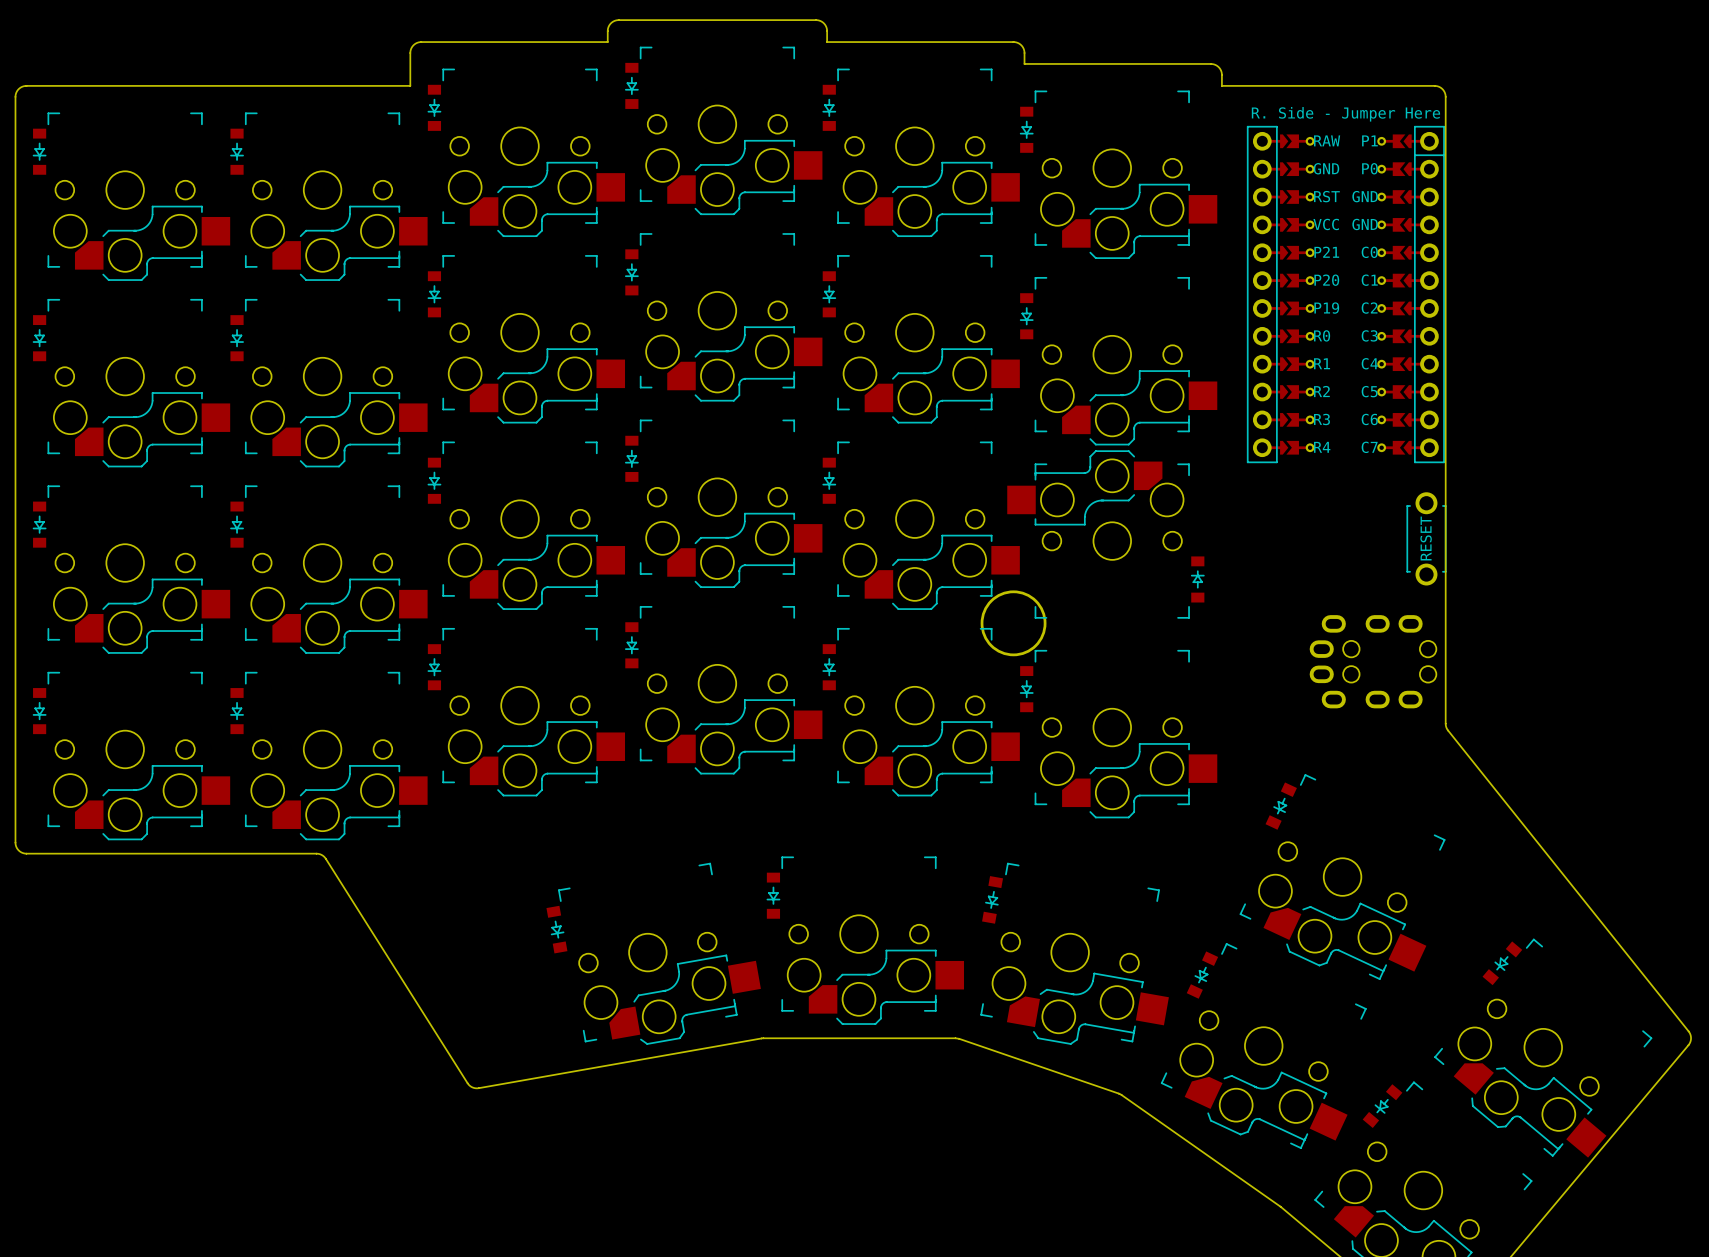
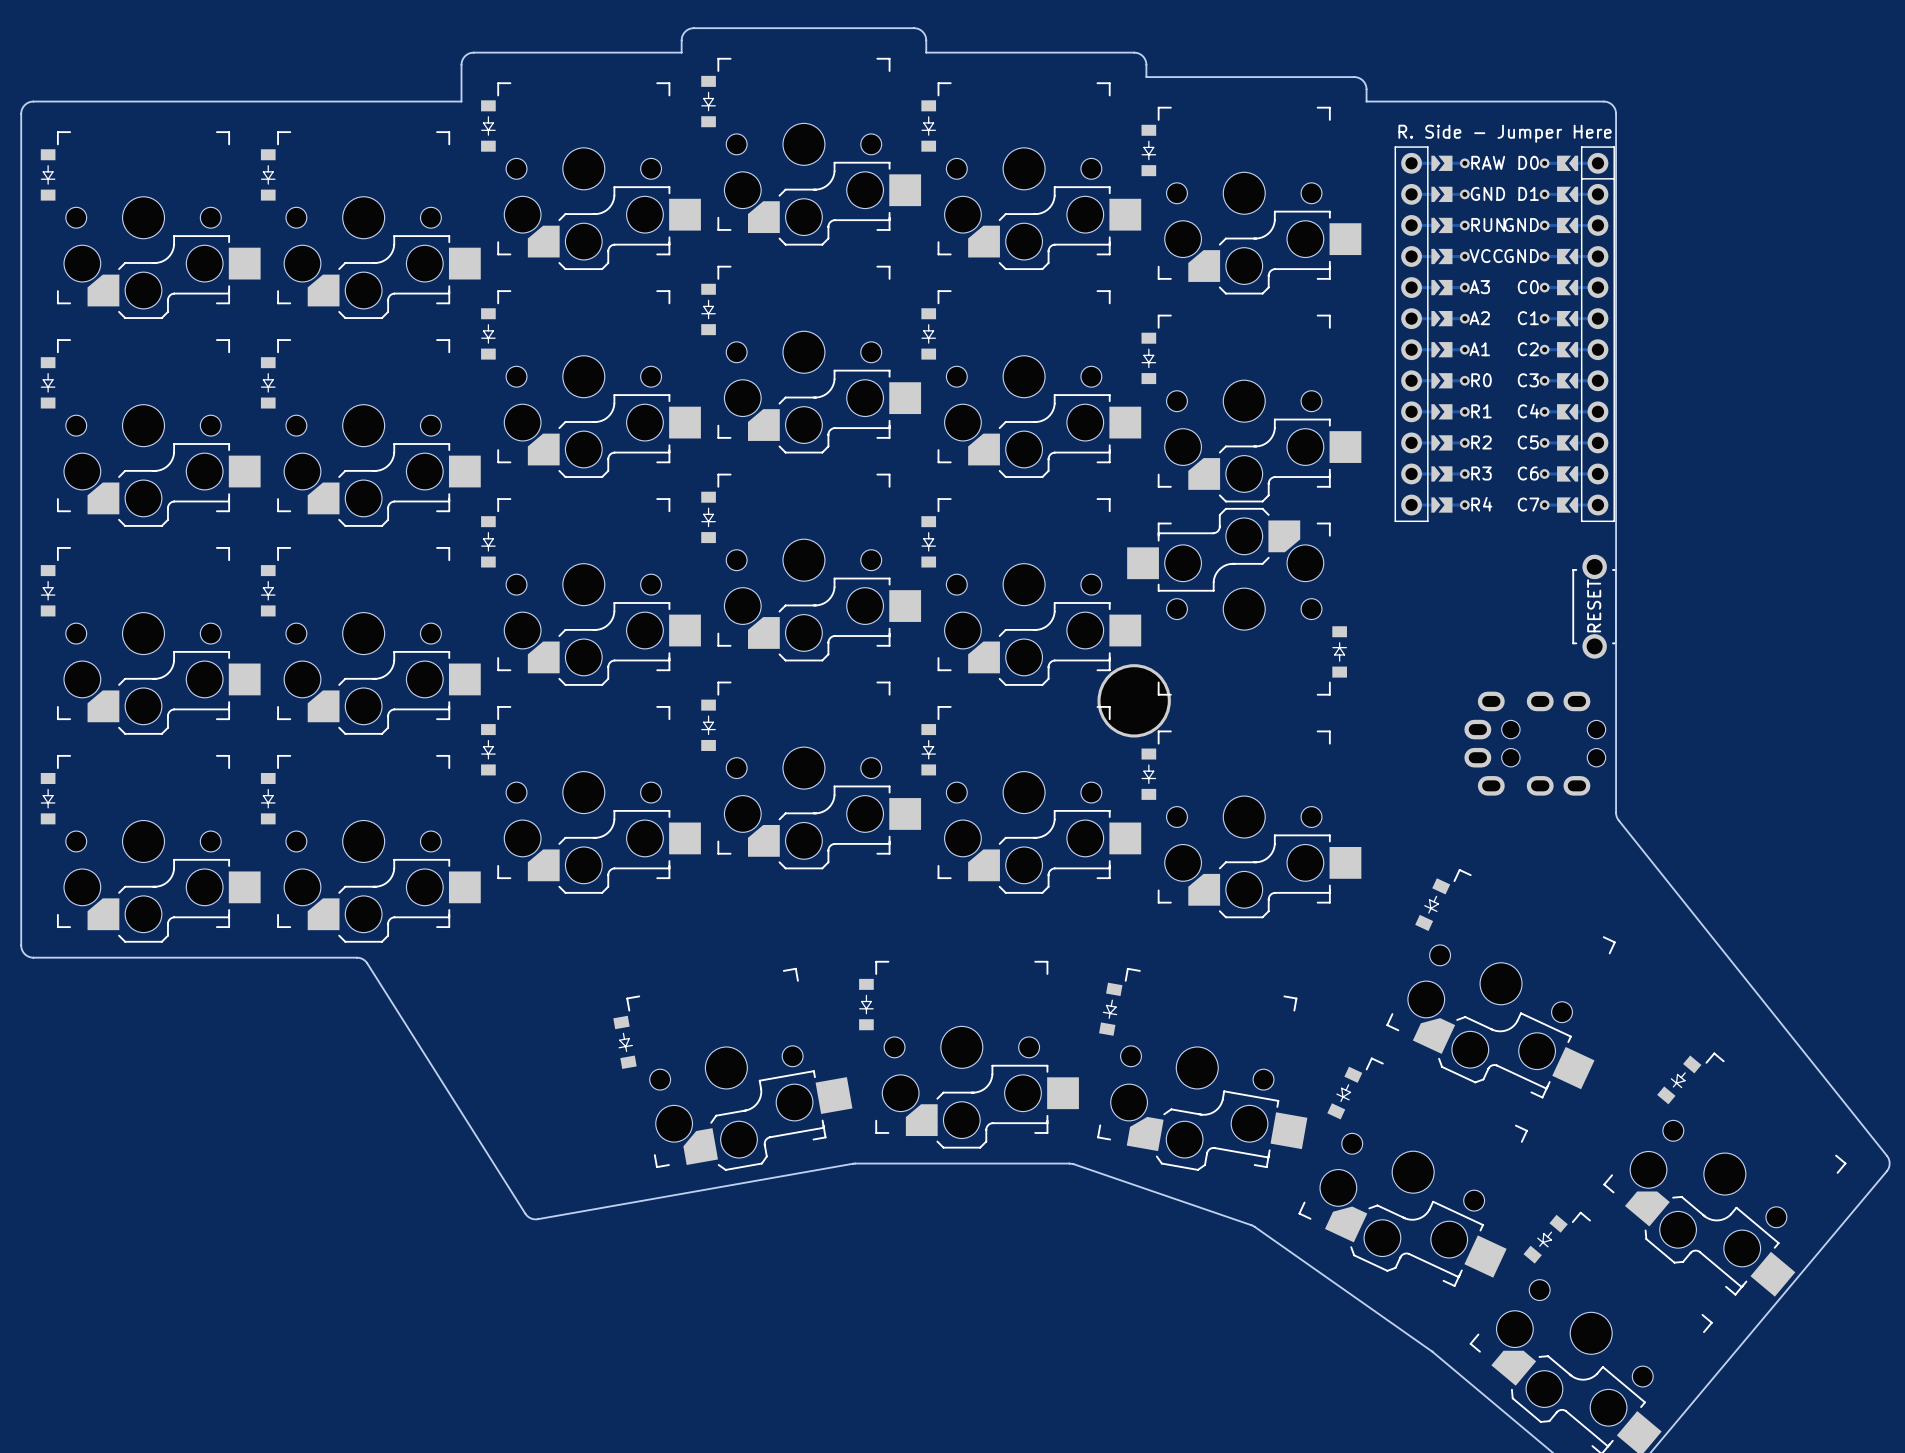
part text: P1 (1369, 140) -> D0 (1528, 162)
part text: P0 (1369, 168) -> D1 (1528, 193)
part text: RST (1326, 196) -> RUN (1488, 224)
part text: P21 (1326, 252) -> A3 (1479, 287)
part text: P20 (1326, 280) -> A2 (1479, 318)
part text: P19 (1326, 308) -> A1 (1479, 349)

